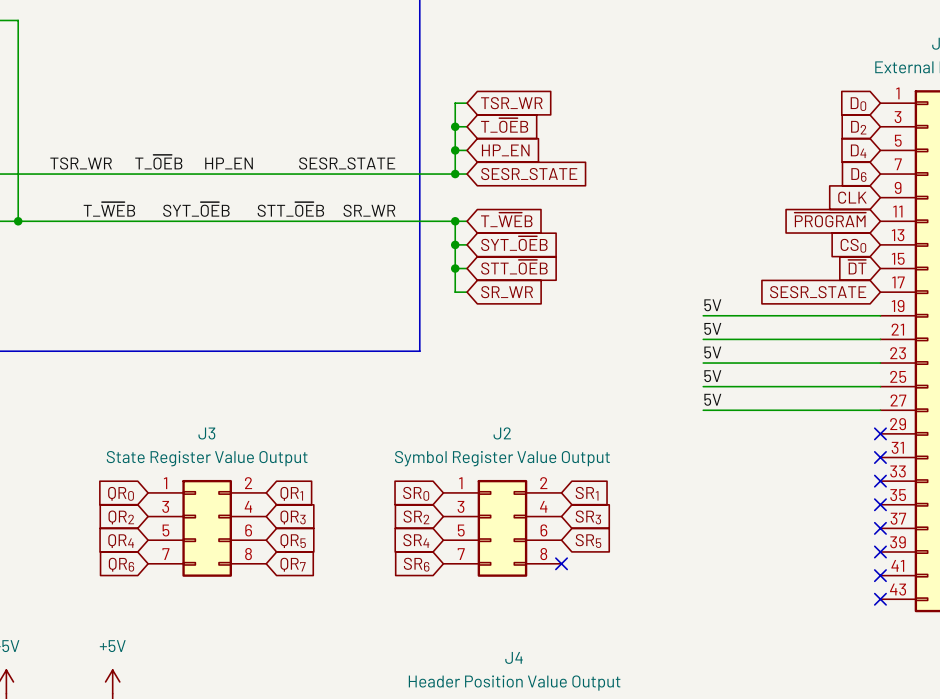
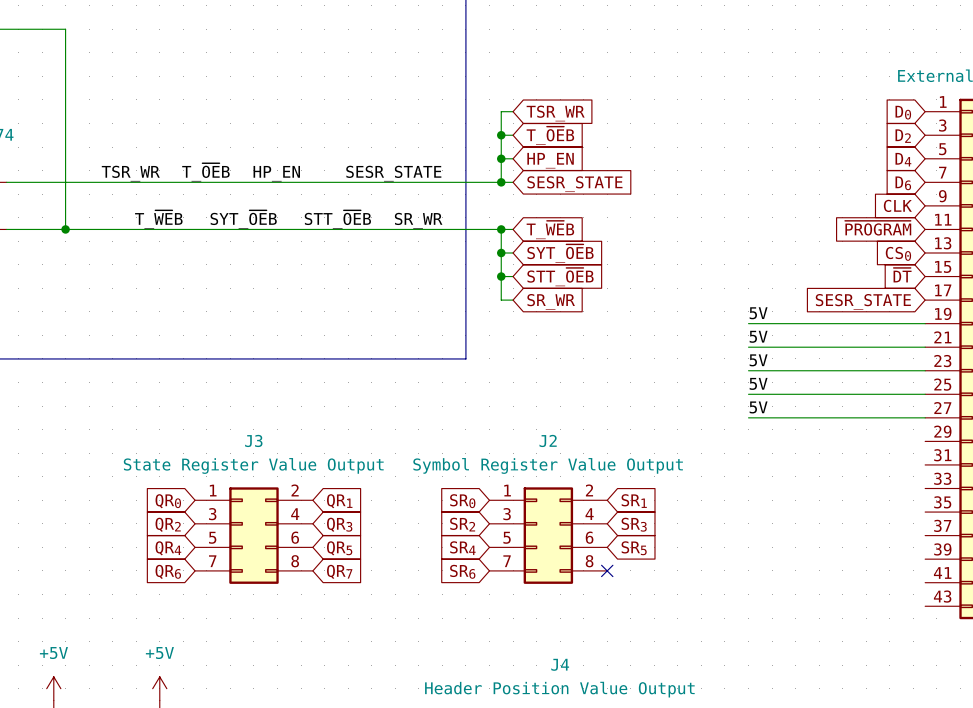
no-connect mark: (880, 433) -> none
no-connect mark: (880, 457) -> none
no-connect mark: (880, 481) -> none
no-connect mark: (880, 504) -> none
no-connect mark: (880, 528) -> none
no-connect mark: (880, 552) -> none
no-connect mark: (880, 575) -> none
no-connect mark: (880, 599) -> none

